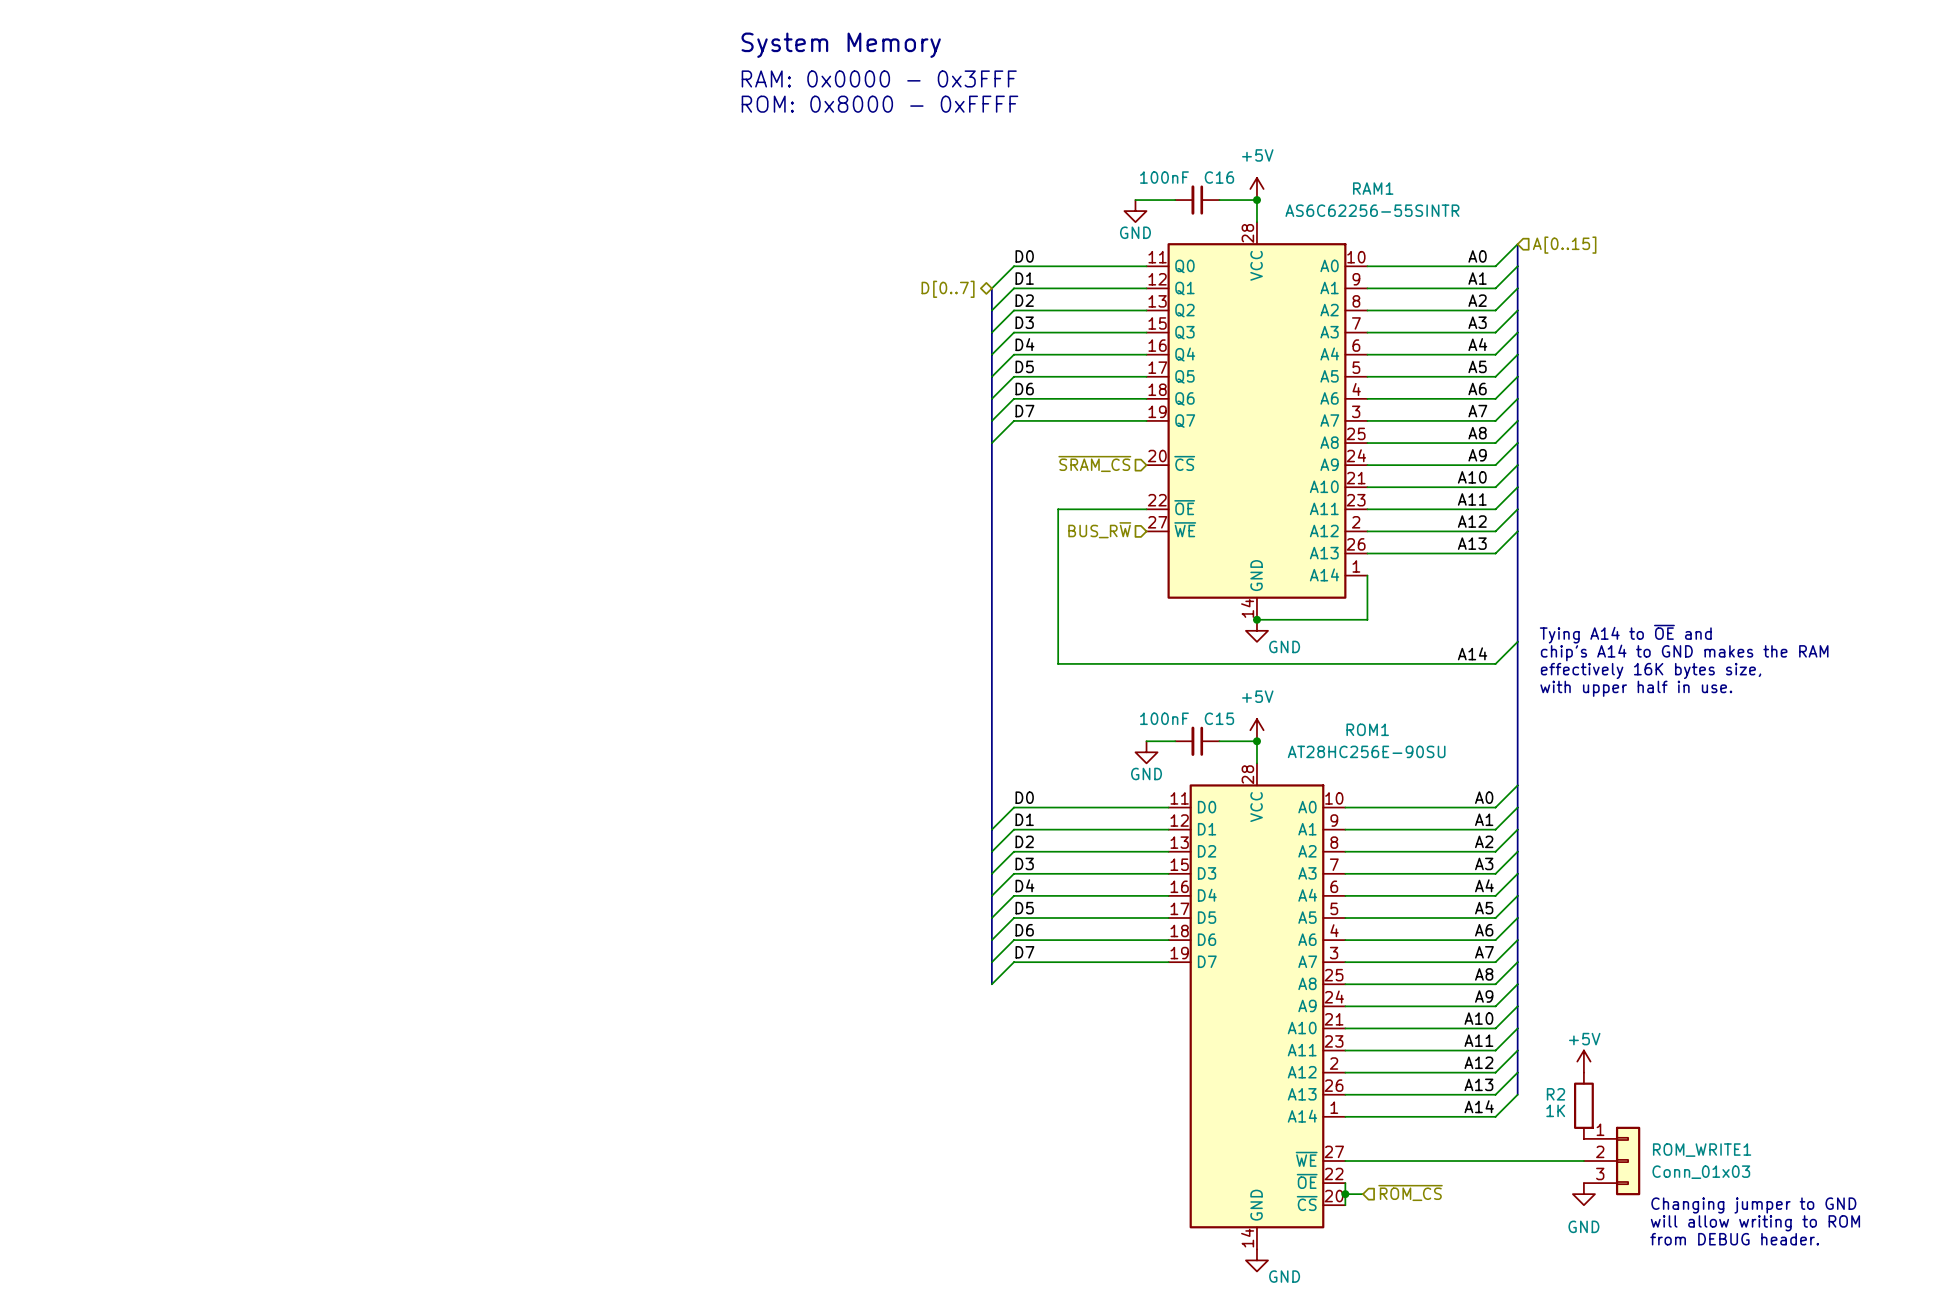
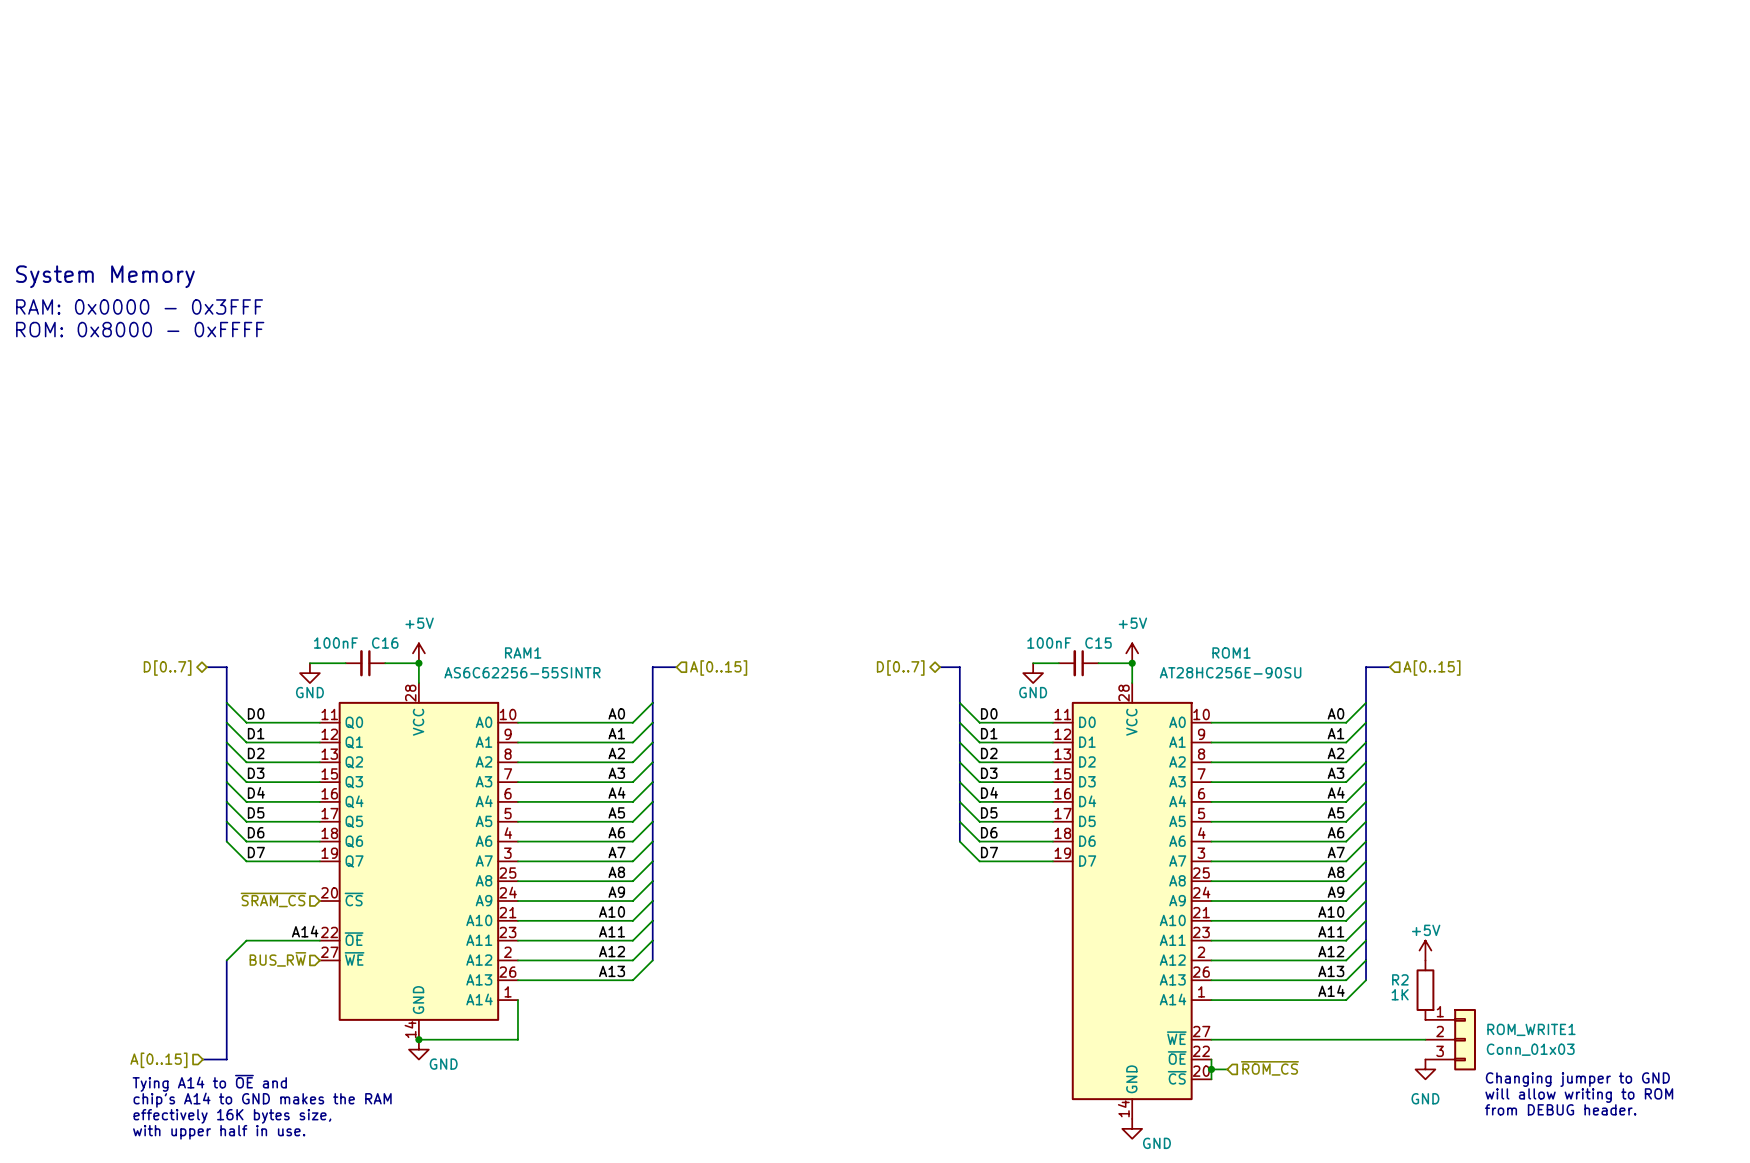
text: System Memory (841, 45) -> none
text: RAM: 0x0000 - 0x3FFF (879, 78) -> none
text: ROM: 0x8000 - 0xFFFF (879, 104) -> none
power symbol: +5V (1256, 188) -> none
wire: (1135, 200) (1175, 200) -> none
C16 position: (1197, 200) -> (365, 663)
wire: (1219, 200) (1256, 200) (1256, 222) -> none
junction: (1256, 200) -> none
power symbol: GND (1135, 211) -> none
wire: (1517, 244) (1495, 266) (1367, 266) -> none
bus: (1517, 244) (1517, 745) -> (1389, 667) (1366, 667)
hierarchical label: A[0..15] (1564, 245) -> none
label: D0 (1024, 256) -> none
label: A0 (1477, 256) -> none
wire: (1146, 266) (1013, 266) (991, 288) -> none
wire: (1517, 266) (1495, 288) (1367, 288) -> none
label: D1 (1024, 278) -> none
label: A1 (1477, 278) -> none
bus: (991, 288) (991, 984) -> none
wire: (1146, 288) (1013, 288) (991, 310) -> none
wire: (1517, 288) (1495, 310) (1367, 310) -> none
hierarchical label: D[0..7] (948, 289) -> none
label: D2 (1024, 300) -> none
label: A2 (1477, 300) -> none
text: none -> System Memory (105, 276)
wire: (1146, 310) (1013, 310) (991, 332) -> none
wire: (1517, 310) (1495, 332) (1367, 332) -> none
label: D3 (1024, 322) -> none
label: A3 (1477, 322) -> none
wire: (1146, 332) (1013, 332) (991, 354) -> none
wire: (1517, 332) (1495, 354) (1367, 354) -> none
text: none -> RAM: 0x0000 - 0x3FFF (139, 306)
label: D4 (1024, 344) -> none
label: A4 (1477, 344) -> none
wire: (1146, 354) (1013, 354) (991, 376) -> none
wire: (1517, 354) (1495, 376) (1367, 376) -> none
label: D5 (1024, 366) -> none
label: A5 (1477, 366) -> none
text: none -> ROM: 0x8000 - 0xFFFF (140, 329)
wire: (1146, 376) (1013, 376) (991, 398) -> none
wire: (1517, 376) (1495, 398) (1367, 398) -> none
label: D6 (1024, 389) -> none
label: A6 (1477, 389) -> none
wire: (1146, 398) (1013, 398) (991, 420) -> none
wire: (1517, 398) (1495, 420) (1367, 420) -> none
label: D7 (1024, 411) -> none
label: A7 (1477, 411) -> none
wire: (1146, 420) (1013, 420) (991, 443) -> none
RAM1 position: (1256, 420) -> (418, 861)
wire: (1517, 420) (1495, 443) (1367, 443) -> none
label: A8 (1477, 433) -> none
wire: (1517, 443) (1495, 465) (1367, 465) -> none
label: A9 (1477, 455) -> none
hierarchical label: ~{SRAM_CS} (1094, 463) -> none
wire: (1517, 465) (1495, 487) (1367, 487) -> none
label: A10 (1472, 477) -> none
wire: (1517, 487) (1495, 509) (1367, 509) -> none
label: A11 (1472, 499) -> none
wire: (1146, 509) (1058, 509) (1058, 663) (1495, 663) (1517, 641) -> none
wire: (1517, 509) (1495, 531) (1367, 531) -> none
label: A12 (1472, 521) -> none
hierarchical label: BUS_R~{W} (1099, 530) -> none
wire: (1517, 531) (1495, 553) (1367, 553) -> none
label: A13 (1472, 543) -> none
wire: (1367, 575) (1367, 619) (1256, 619) -> none
junction: (1256, 619) -> none
power symbol: GND (1256, 630) -> none
text: Tying A14 to ~{OE} and (1625, 634) -> none
text: chip's A14 to GND makes the RAM (1684, 652) -> none
label: A14 (1472, 653) -> none
text: effectively 16K bytes size, (1651, 670) -> none
text: with upper half in use. (1636, 688) -> none
power symbol: none -> +5V (418, 653)
wire: none -> (309, 663) (345, 663)
wire: none -> (385, 663) (418, 663) (418, 683)
junction: none -> (418, 663)
bus: none -> (206, 667) (226, 667) (226, 841)
bus: none -> (676, 667) (652, 667) (652, 960)
bus: none -> (940, 667) (959, 667) (959, 841)
hierarchical label: none -> D[0..7] (167, 668)
hierarchical label: none -> A[0..15] (718, 668)
hierarchical label: none -> D[0..7] (900, 668)
hierarchical label: none -> A[0..15] (1431, 668)
power symbol: none -> GND (309, 673)
wire: none -> (226, 702) (246, 722) (319, 722)
wire: none -> (652, 702) (632, 722) (517, 722)
label: none -> D0 (256, 713)
label: none -> A0 (616, 713)
label position: D0 (1024, 797) -> D0 (989, 713)
wire: none -> (226, 722) (246, 742) (319, 742)
wire: none -> (652, 722) (632, 742) (517, 742)
wire: (1086, 807) (1013, 807) (991, 829) -> (979, 722) (959, 702)
label: none -> D1 (256, 733)
label: none -> A1 (616, 733)
label position: D1 (1024, 819) -> D1 (989, 733)
wire: none -> (226, 742) (246, 762) (319, 762)
wire: none -> (652, 742) (632, 762) (517, 762)
wire: (1086, 829) (1013, 829) (991, 851) -> (979, 742) (959, 722)
label: none -> D2 (256, 753)
label: none -> A2 (616, 753)
label position: D2 (1024, 841) -> D2 (989, 753)
wire: none -> (226, 762) (246, 782) (319, 782)
wire: none -> (652, 762) (632, 782) (517, 782)
wire: (1086, 851) (1013, 851) (991, 873) -> (979, 762) (959, 742)
label: none -> D3 (256, 773)
label: none -> A3 (616, 773)
label position: D3 (1024, 863) -> D3 (989, 773)
wire: none -> (226, 782) (246, 801) (319, 801)
wire: none -> (652, 782) (632, 801) (517, 801)
wire: (1086, 873) (1013, 873) (991, 895) -> (979, 782) (959, 762)
label: none -> D4 (256, 792)
label: none -> A4 (616, 792)
label position: D4 (1024, 885) -> D4 (989, 792)
wire: none -> (226, 801) (246, 821) (319, 821)
wire: none -> (652, 801) (632, 821) (517, 821)
wire: (1086, 895) (1013, 895) (991, 918) -> (979, 801) (959, 782)
label: none -> D5 (256, 812)
label: none -> A5 (616, 812)
label position: D5 (1024, 908) -> D5 (989, 812)
wire: none -> (226, 821) (246, 841) (319, 841)
wire: none -> (652, 821) (632, 841) (517, 841)
wire: (1086, 918) (1013, 918) (991, 940) -> (979, 821) (959, 801)
label: none -> D6 (256, 832)
label: none -> A6 (616, 832)
label position: D6 (1024, 930) -> D6 (989, 832)
wire: none -> (226, 841) (246, 861) (319, 861)
wire: none -> (652, 841) (632, 861) (517, 861)
wire: (1086, 940) (1013, 940) (991, 962) -> (979, 841) (959, 821)
label: none -> D7 (256, 852)
label: none -> A7 (616, 852)
label position: D7 (1024, 952) -> D7 (989, 852)
wire: none -> (652, 861) (632, 881) (517, 881)
wire: (1086, 962) (1013, 962) (991, 984) -> (979, 861) (959, 841)
label: none -> A8 (616, 872)
wire: none -> (652, 881) (632, 901) (517, 901)
label: none -> A9 (616, 892)
hierarchical label: none -> ~{SRAM_CS} (273, 899)
wire: none -> (652, 901) (632, 920) (517, 920)
label: none -> A10 (612, 911)
wire: none -> (652, 920) (632, 940) (517, 940)
label: none -> A14 (305, 931)
label: none -> A11 (612, 931)
wire: none -> (319, 940) (246, 940) (226, 960)
wire: none -> (652, 940) (632, 960) (517, 960)
label: none -> A12 (612, 951)
hierarchical label: none -> BUS_R~{W} (277, 959)
bus: none -> (226, 960) (226, 1059) (202, 1059)
wire: none -> (652, 960) (632, 980) (517, 980)
label: none -> A13 (612, 971)
wire: none -> (517, 1000) (517, 1039) (418, 1039)
junction: none -> (418, 1039)
power symbol: none -> GND (418, 1049)
hierarchical label: none -> A[0..15] (158, 1060)
text: none -> Tying A14 to ~{OE} and (209, 1083)
text: none -> chip's A14 to GND makes the RAM (262, 1100)
text: none -> effectively 16K bytes size, (232, 1116)
text: none -> with upper half in use. (219, 1132)

